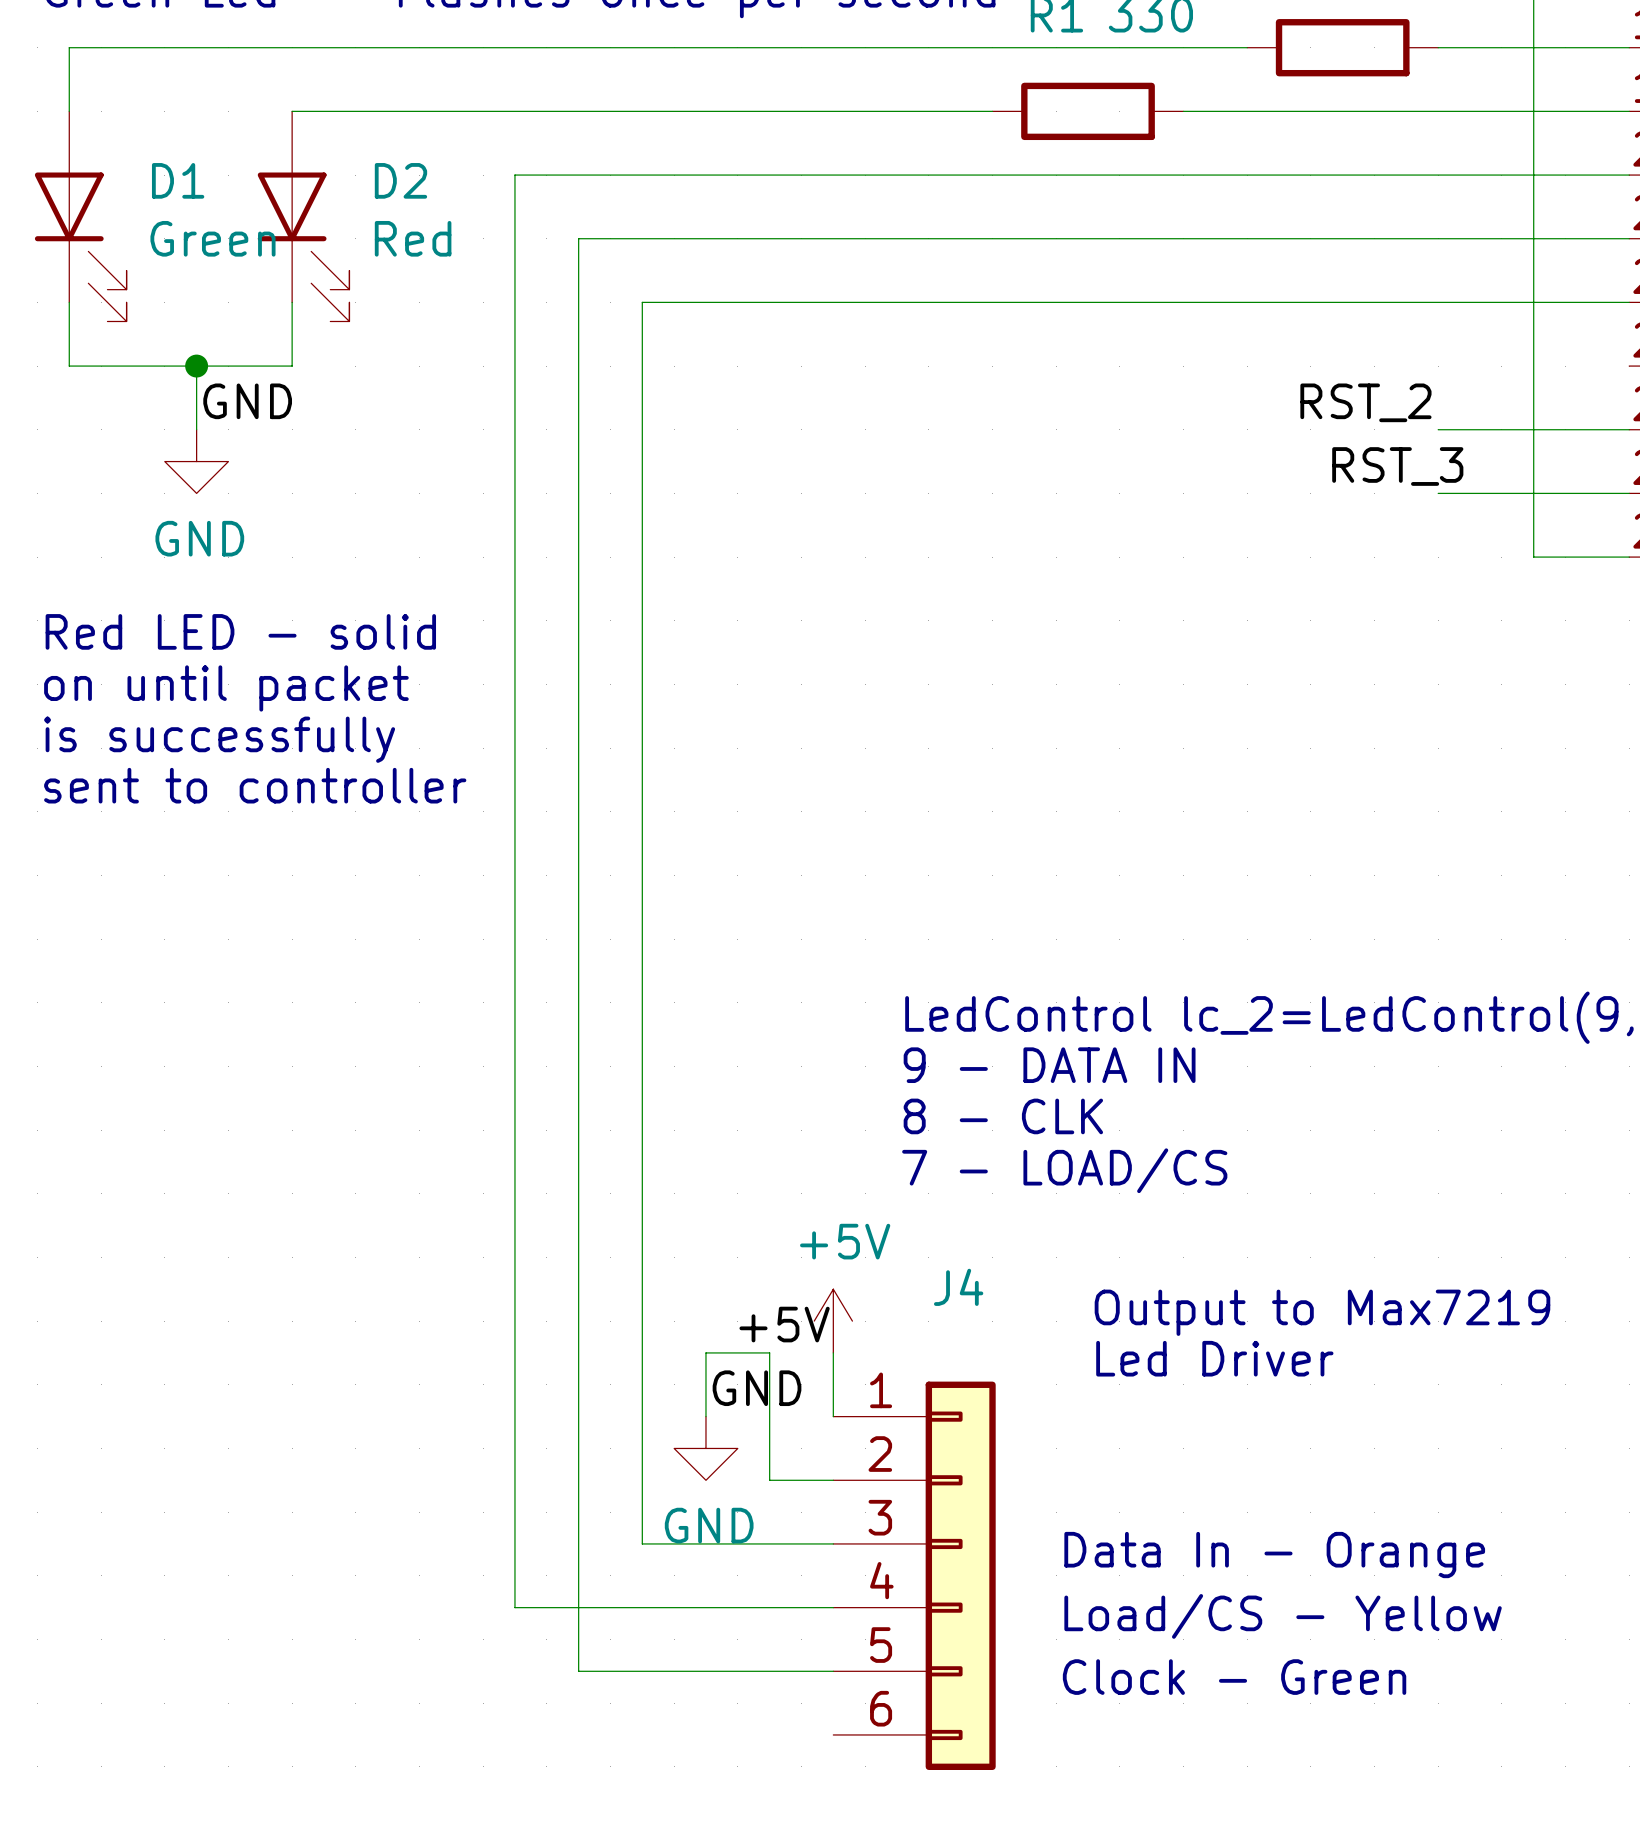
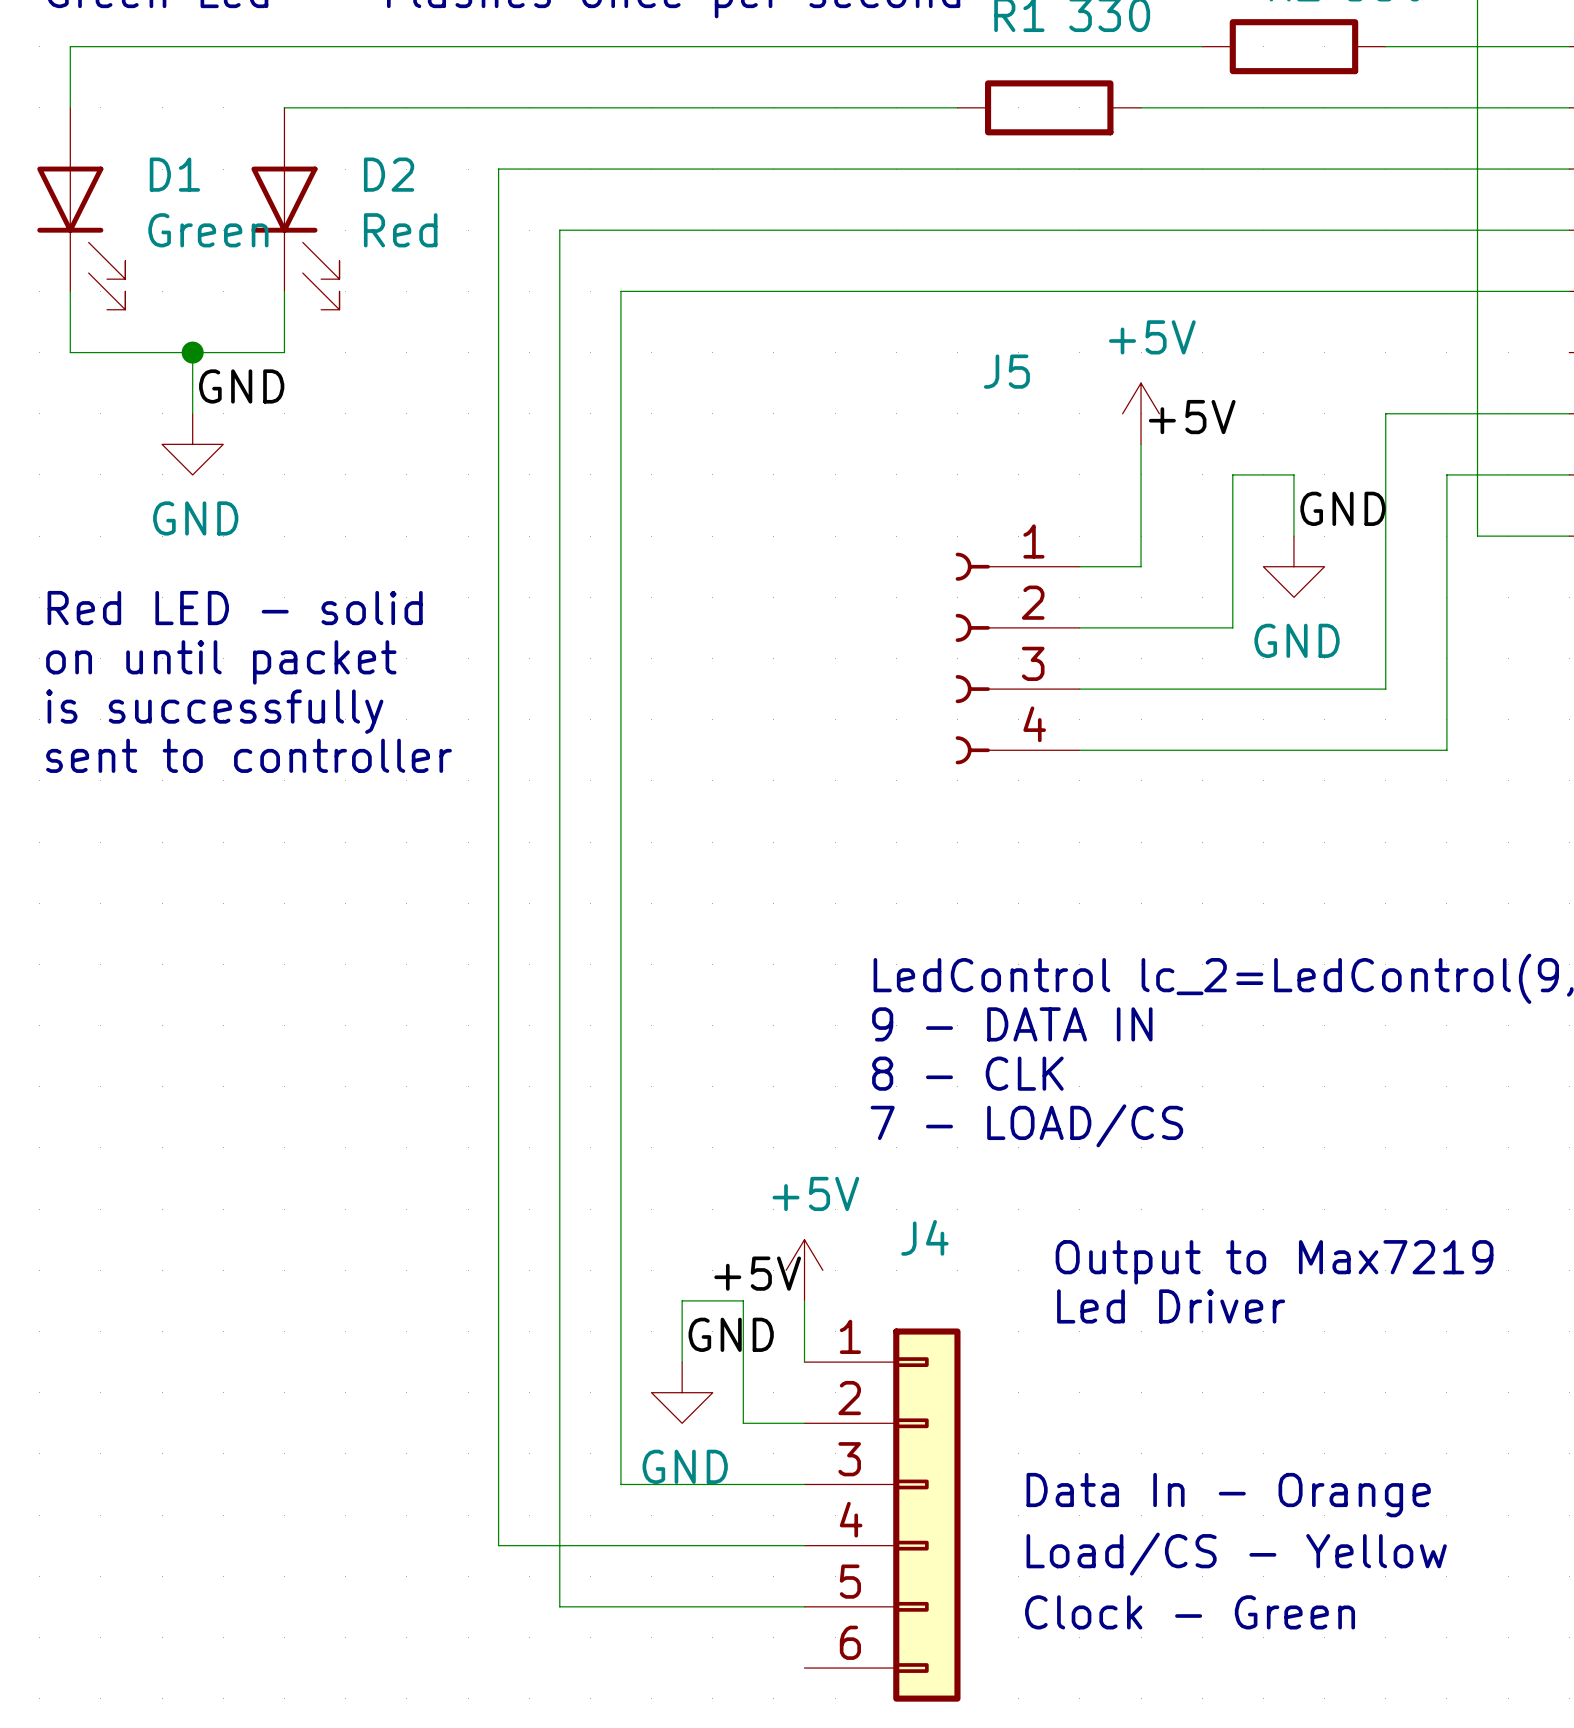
label: RST_2 (1365, 402) -> none
power symbol: none -> +5V (1141, 413)
wire: none -> (1385, 413) (1385, 689) (1079, 689)
label: none -> +5V (1192, 417)
wire: none -> (1141, 444) (1141, 566) (1079, 566)
label: RST_3 (1397, 466) -> none
wire: (1438, 493) (1501, 493) -> (1079, 750) (1446, 750) (1446, 474)
label: none -> GND (1343, 508)
wire: none -> (1293, 536) (1293, 474) (1232, 474) (1232, 627) (1079, 627)
power symbol: none -> GND (1293, 566)
J5: none -> (1017, 658)

